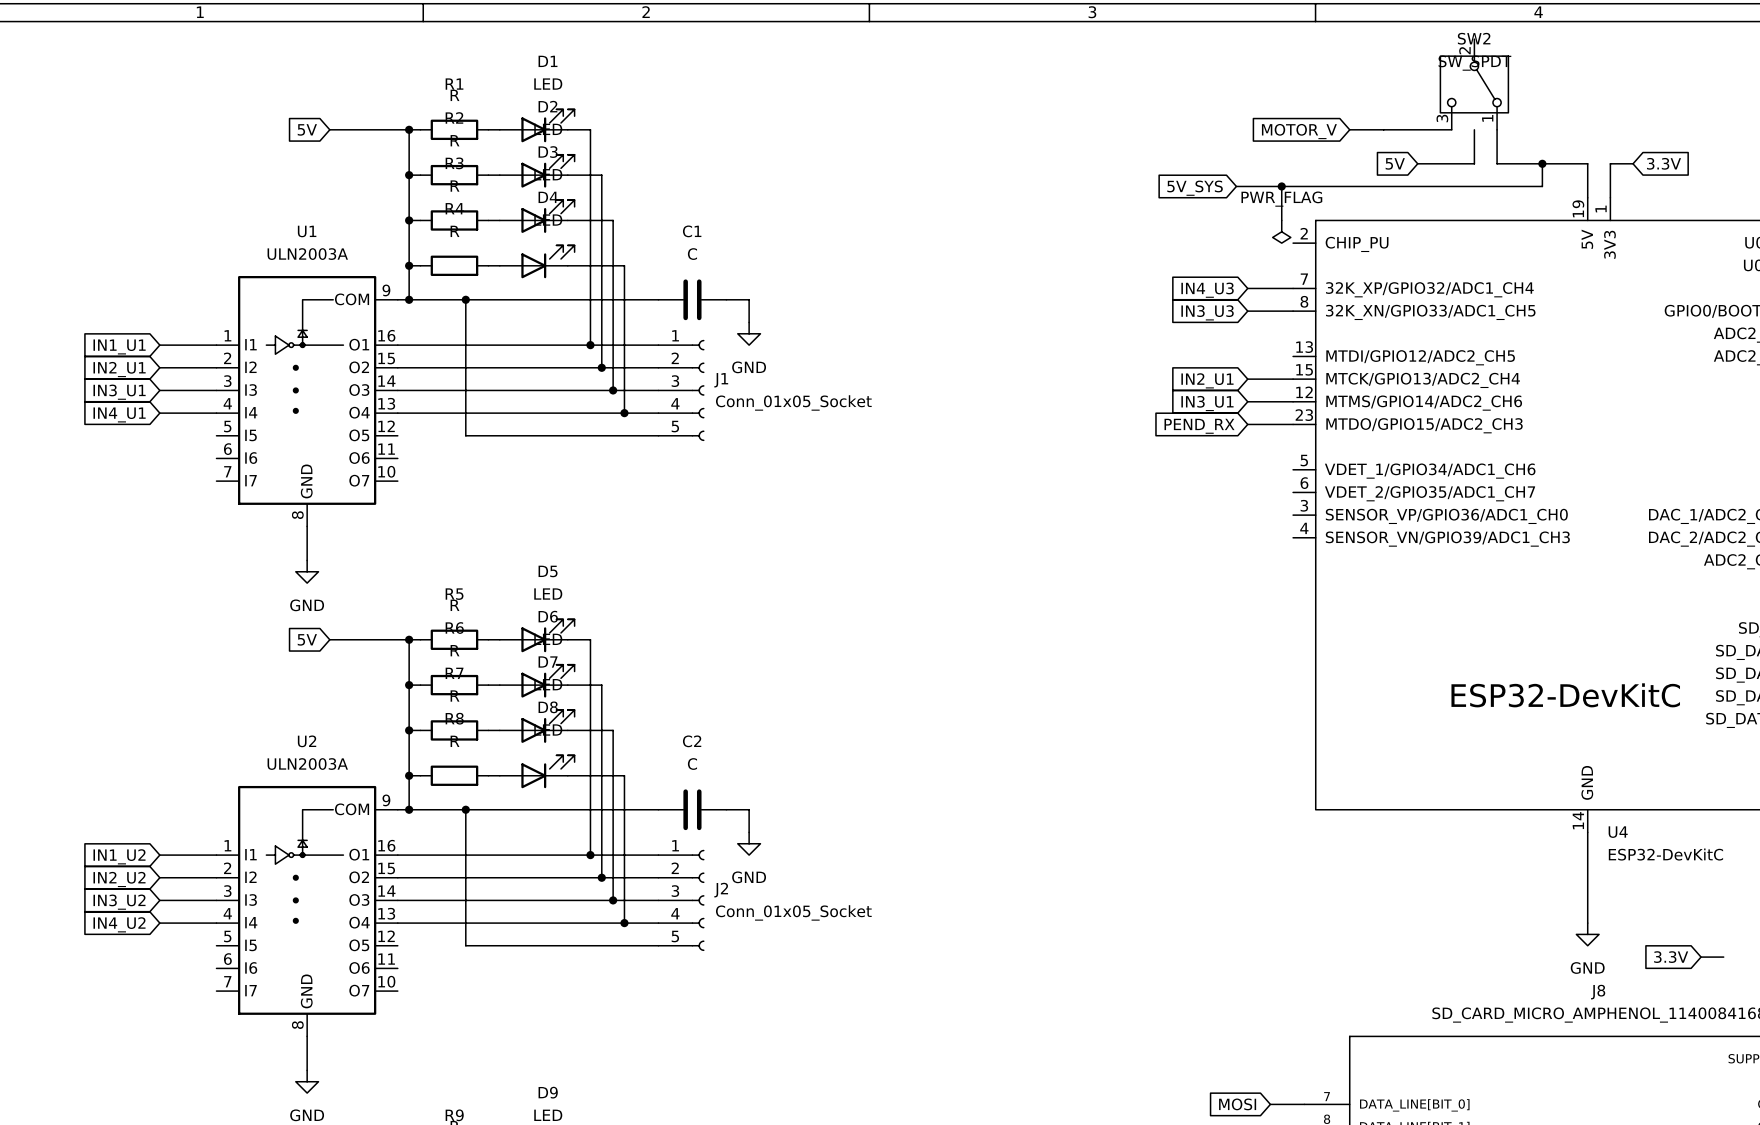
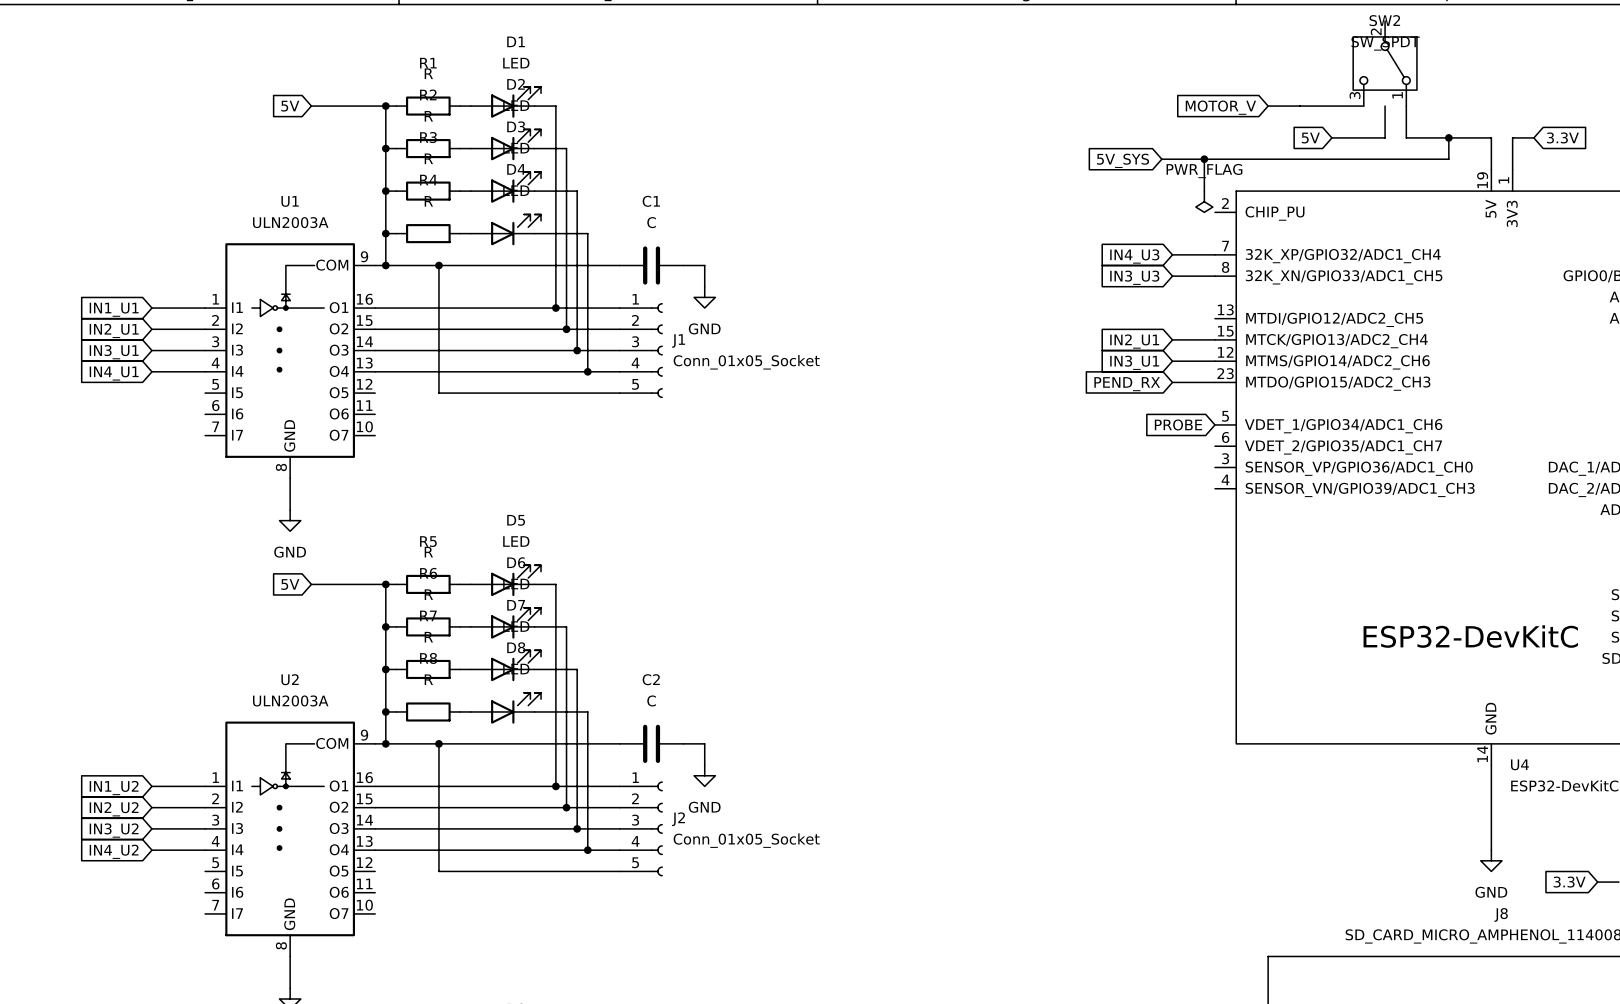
global label: none -> PROBE (1178, 424)

